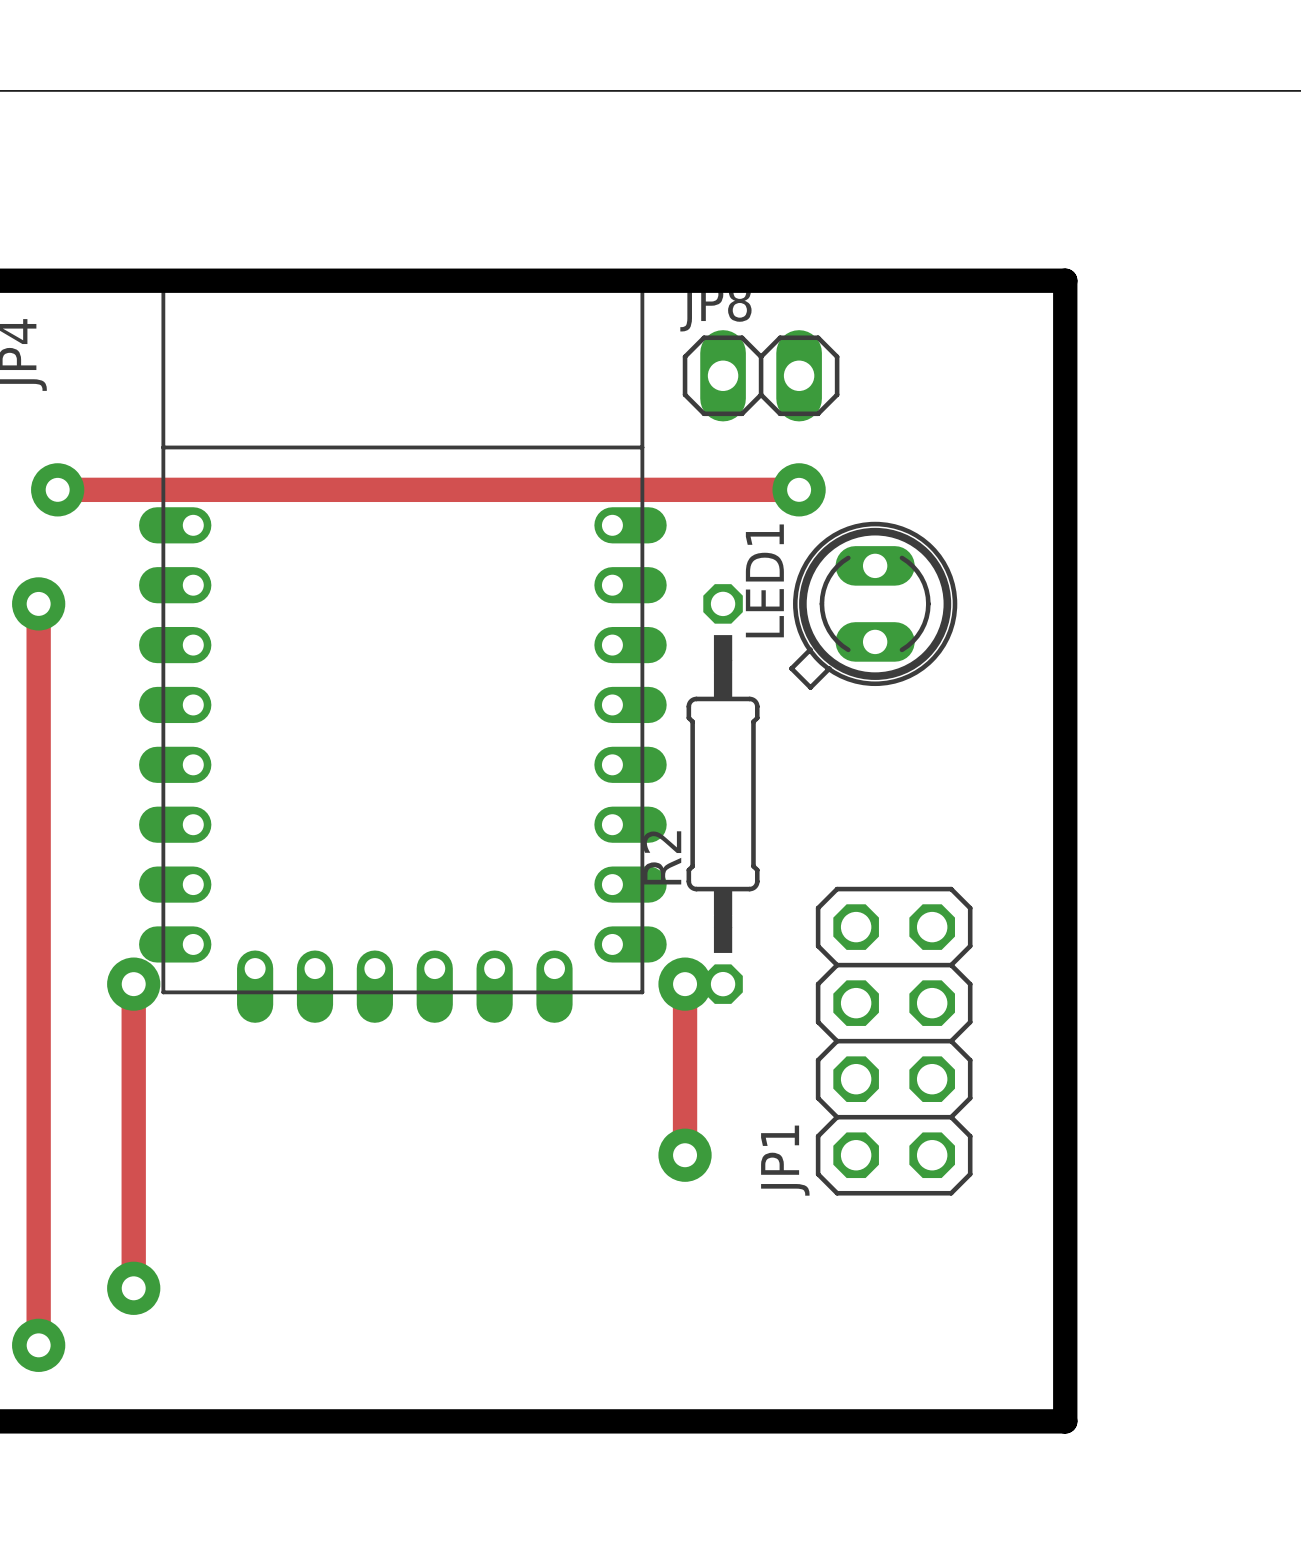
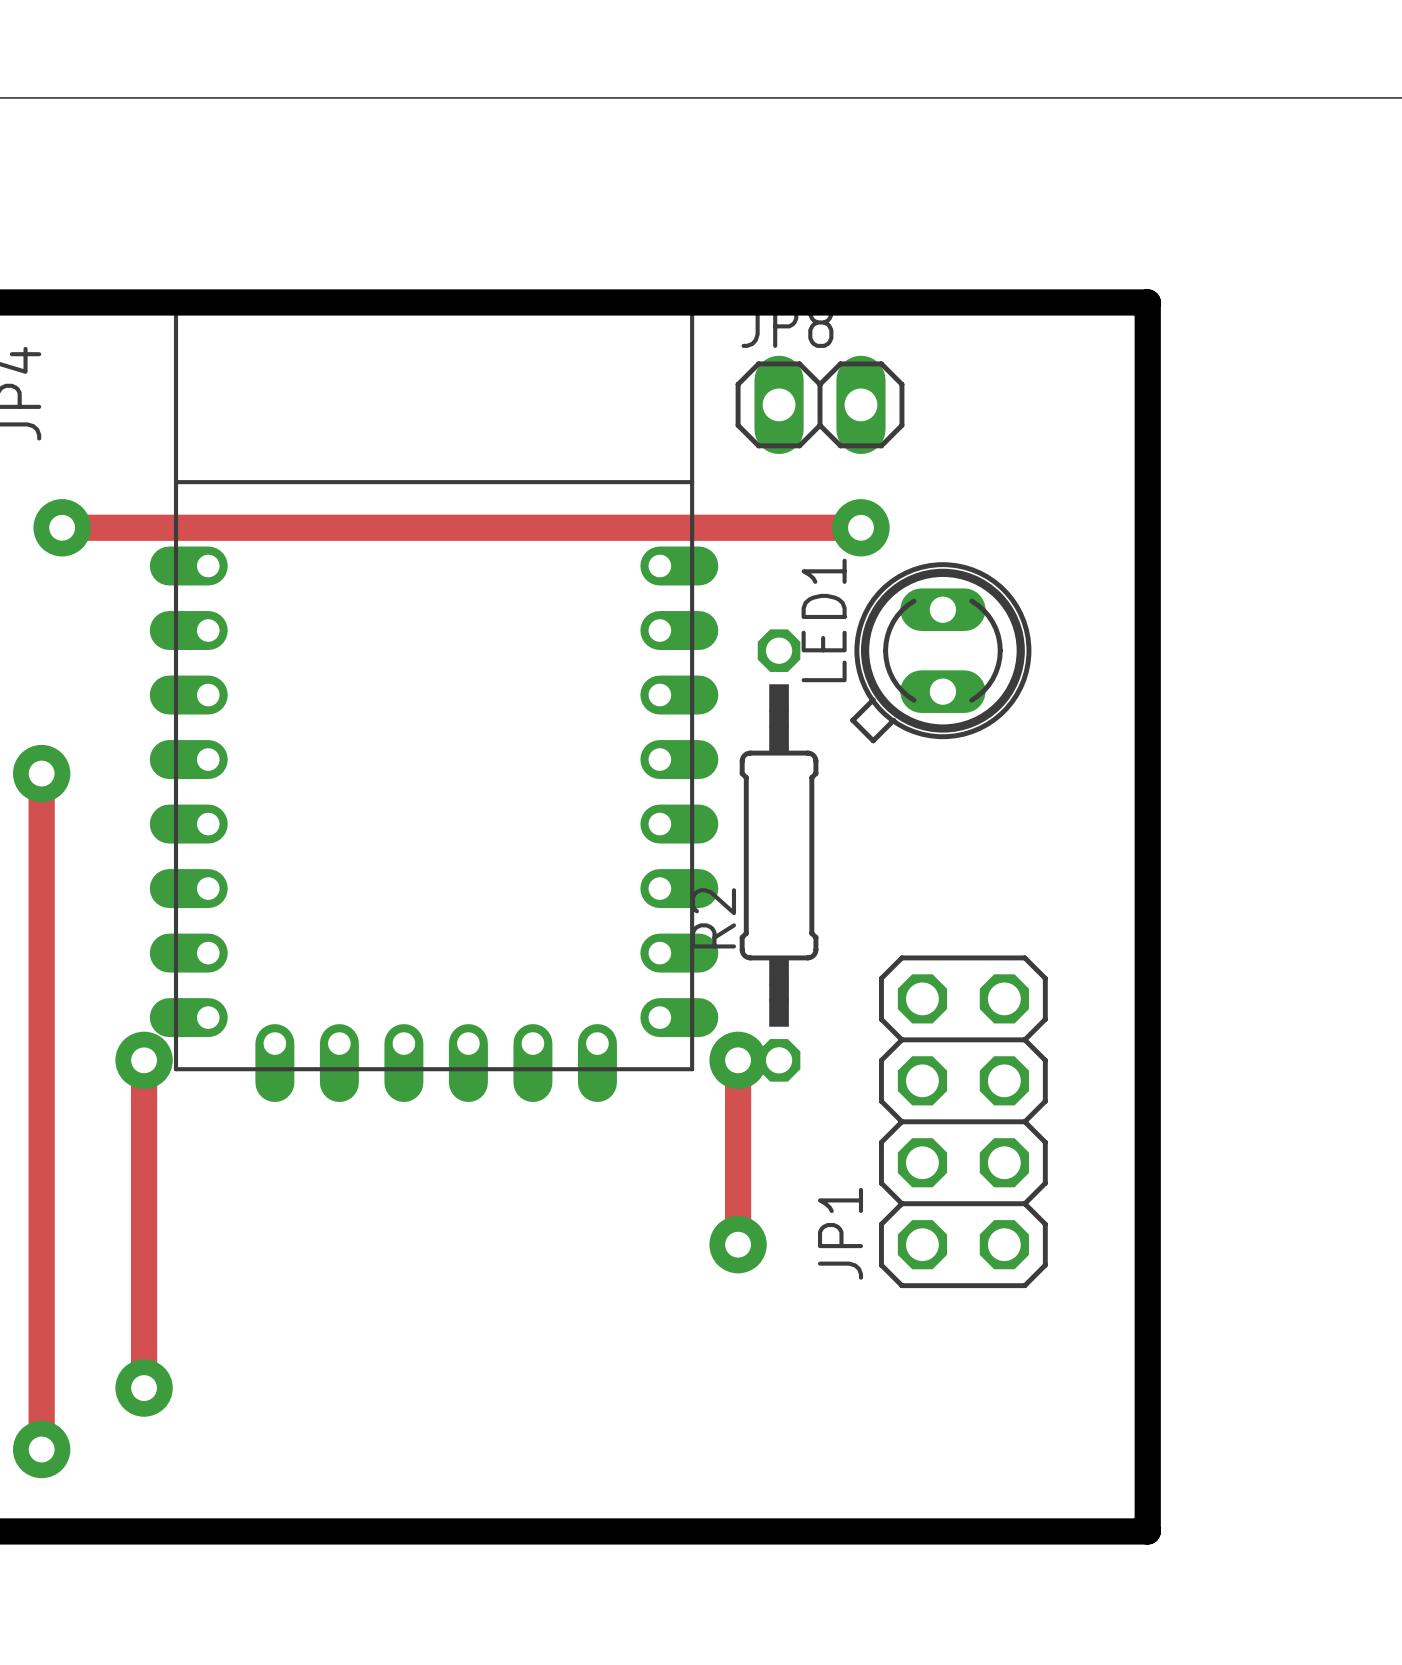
track: (38, 603) (38, 717) -> none
via position: (38, 603) -> (41, 773)

